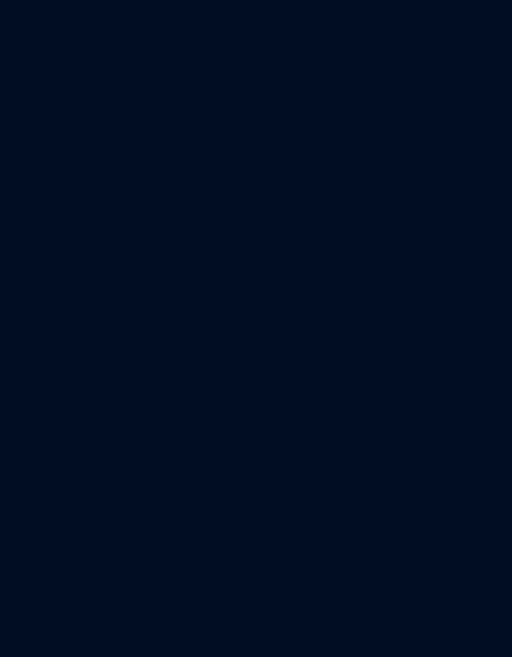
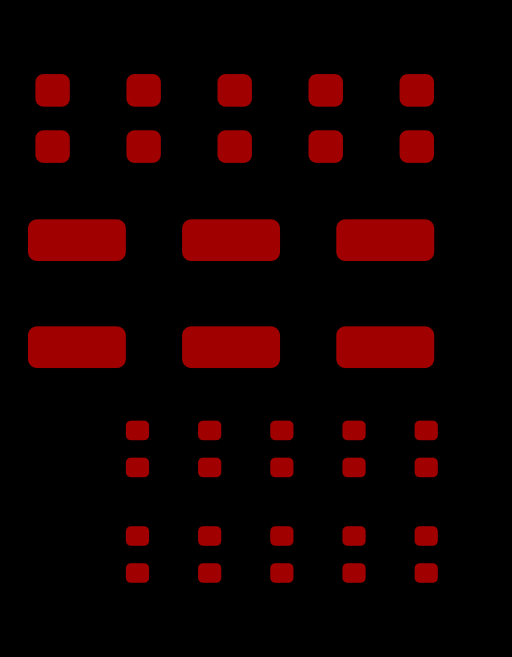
part: none -> (52, 118)
part: none -> (143, 118)
part: none -> (234, 118)
part: none -> (325, 118)
part: none -> (416, 118)
part: none -> (76, 293)
part: none -> (231, 293)
part: none -> (385, 293)
part: none -> (137, 448)
part: none -> (209, 448)
part: none -> (281, 448)
part: none -> (354, 448)
part: none -> (426, 448)
part: none -> (137, 554)
part: none -> (209, 554)
part: none -> (281, 554)
part: none -> (354, 554)
part: none -> (426, 554)

